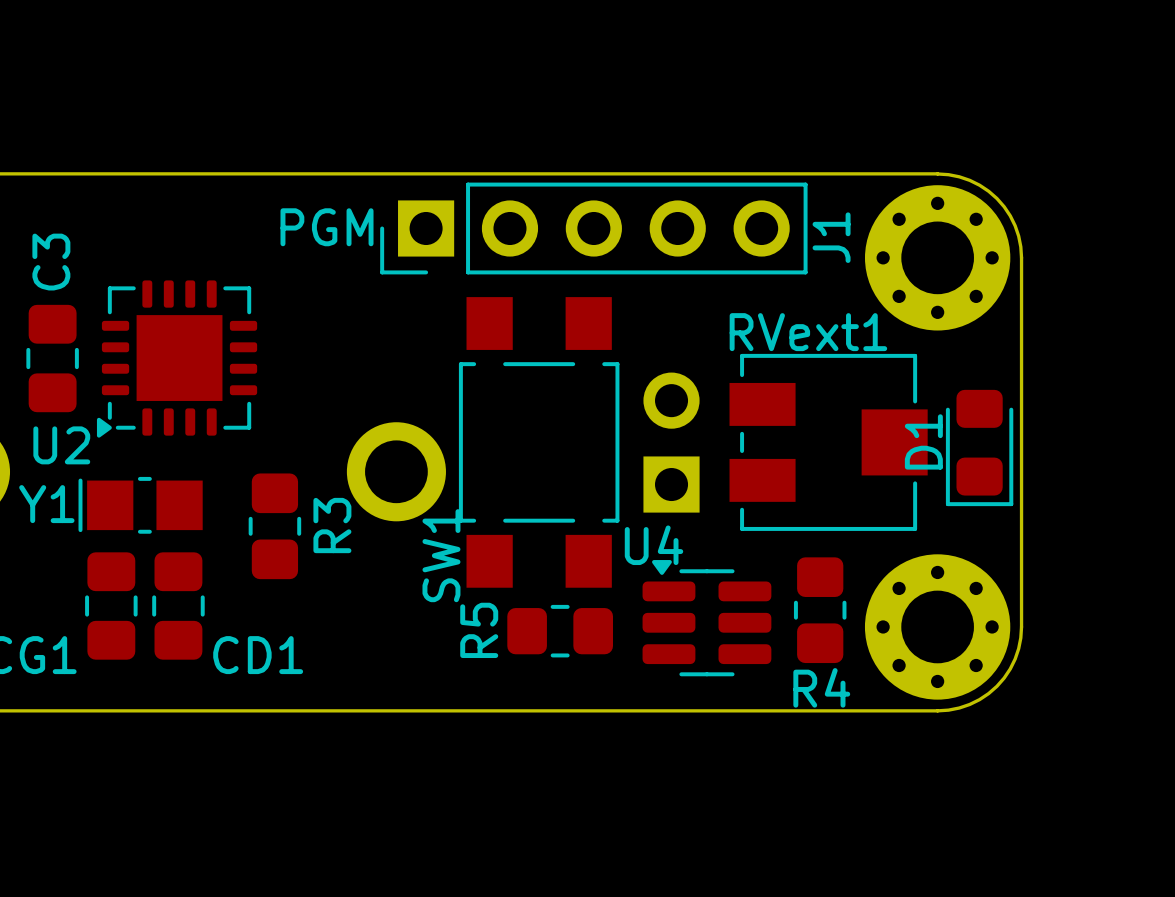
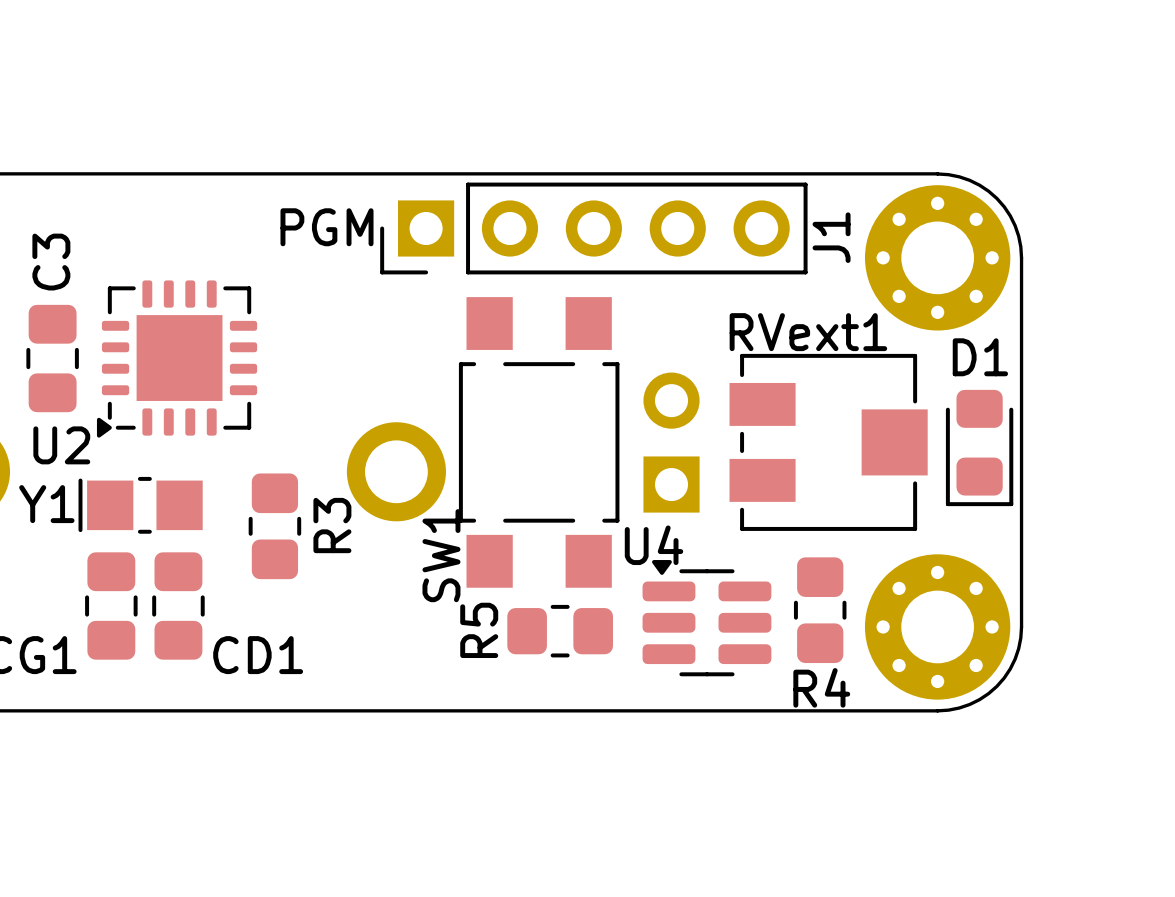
D1 name rotation: 0° (923, 441) -> 90° clockwise (980, 357)
D1 name position: D1 (923, 441) -> D1 (980, 357)

